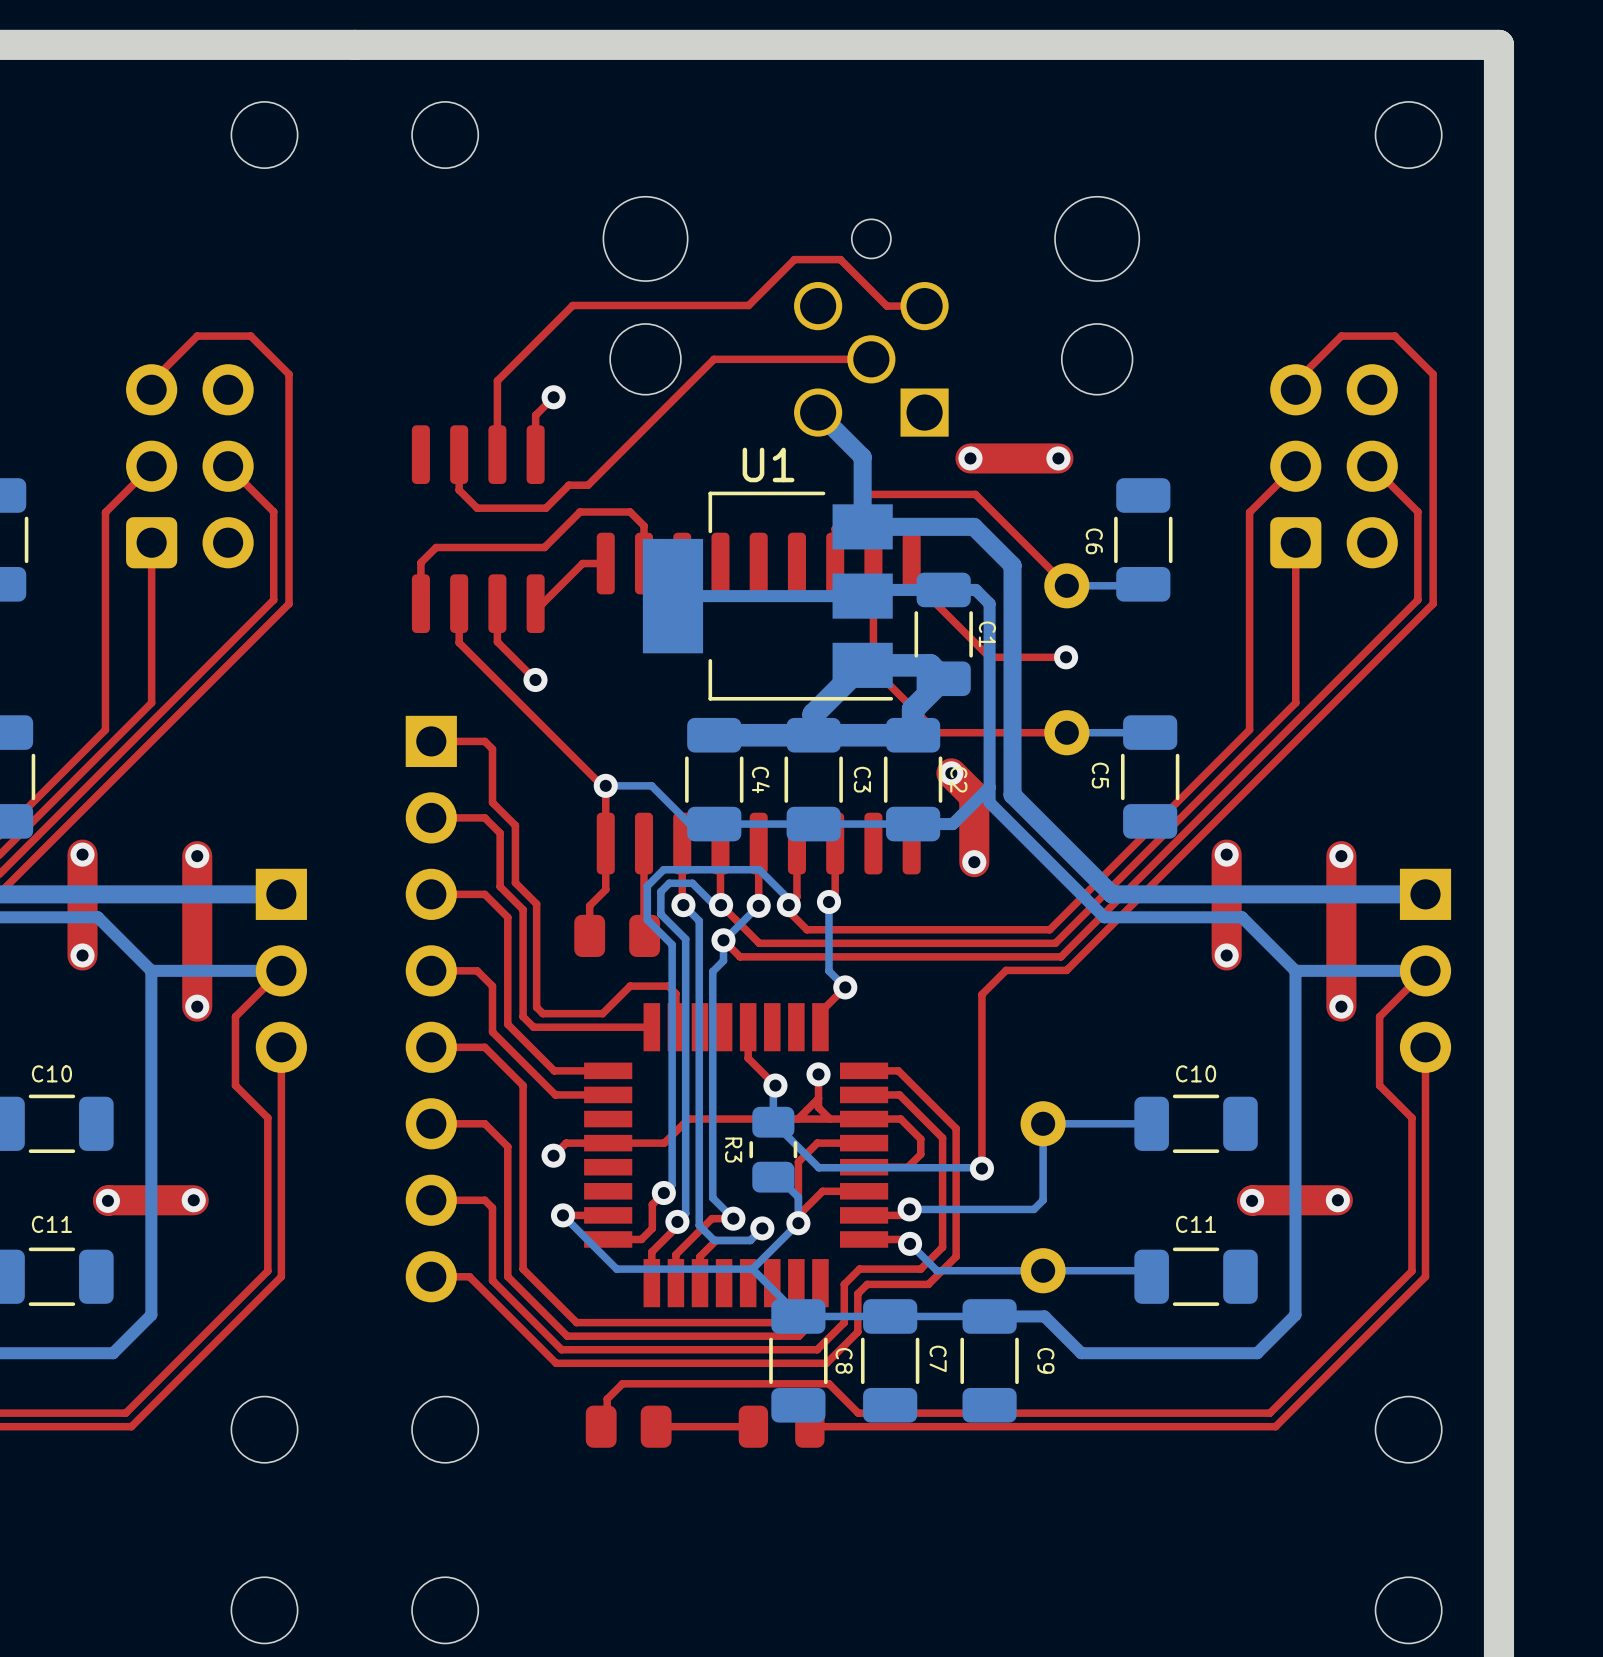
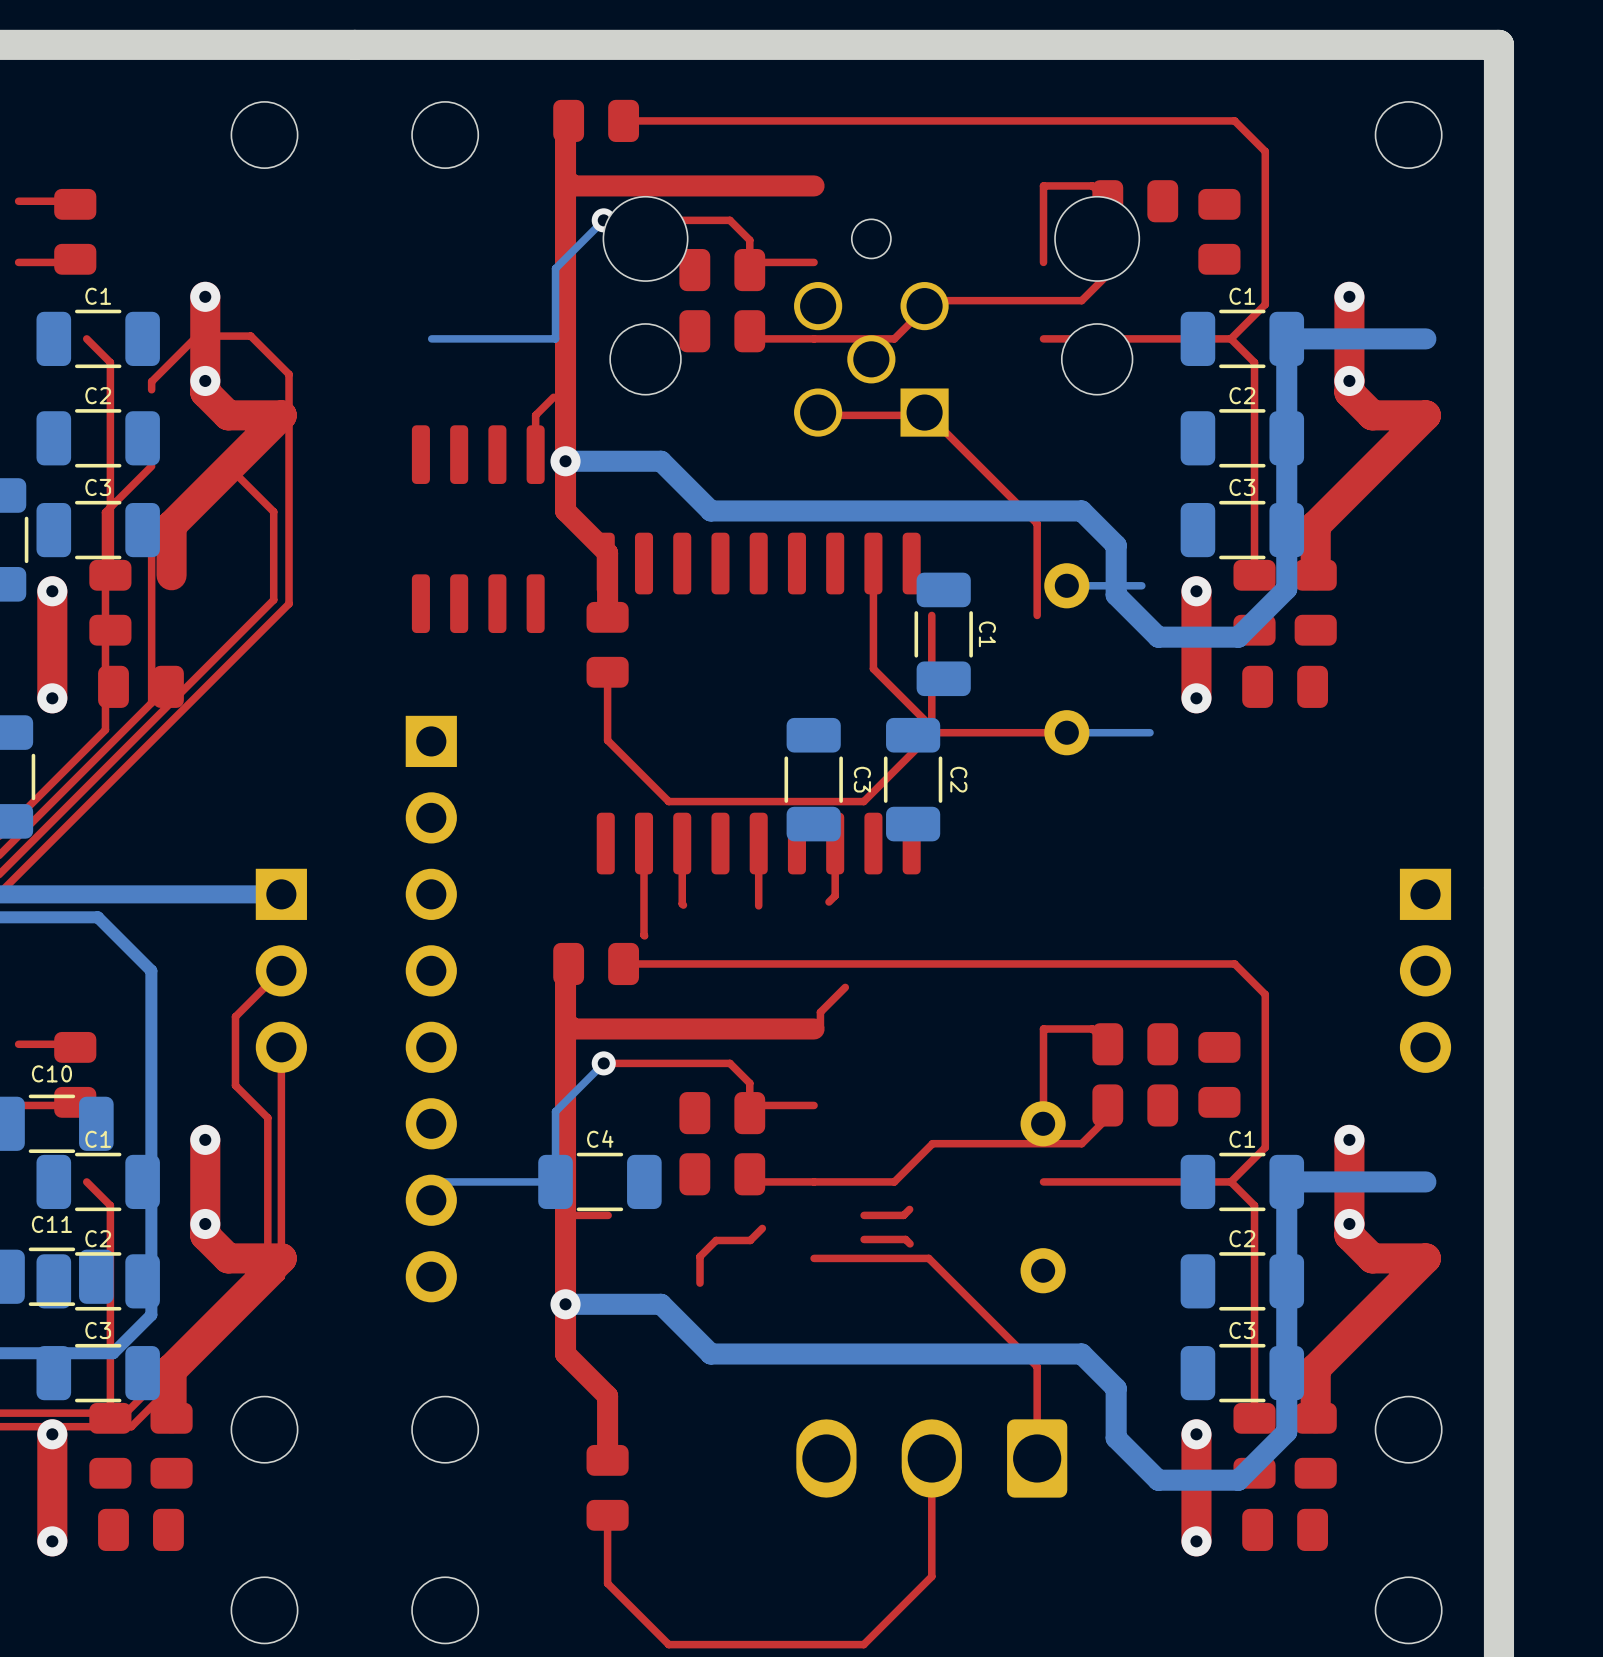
top track: none -> (568, 120) (565, 124) (565, 510) (607, 553) (607, 617)
part: none -> (596, 120)
top track: none -> (623, 120) (1234, 120) (1265, 151) (1265, 304) (1230, 338)
top track: none -> (565, 178) (573, 185) (814, 185)
top track: none -> (18, 201) (72, 201) (75, 204)
top track: none -> (1107, 201) (1092, 185) (1043, 185) (1043, 262)
part: none -> (1135, 201)
top track: none -> (603, 220) (729, 220) (749, 240) (749, 270) (757, 262) (814, 262)
bottom track: none -> (603, 220) (555, 268) (555, 338) (431, 338)
via: none -> (603, 220)
part: none -> (75, 231)
part: none -> (1219, 231)
top track: none -> (75, 259) (72, 262) (18, 262)
top track: none -> (1107, 262) (1107, 274) (1081, 300) (932, 300) (894, 338) (757, 338) (749, 331)
part: none -> (722, 270)
top track: none -> (205, 296) (205, 392) (228, 415) (281, 415) (171, 525) (171, 575)
via: none -> (205, 296)
top track: none -> (1349, 296) (1349, 392) (1372, 415) (1425, 415) (1315, 525) (1315, 575)
via: none -> (1349, 296)
top track: (924, 306) (886, 306) (840, 259) (794, 259) (748, 305) (572, 305) (497, 380) (497, 454) -> none
part: none -> (722, 331)
top track: none -> (86, 338) (110, 362) (110, 575)
C1: none -> (98, 338)
top track: none -> (1230, 338) (1043, 338)
top track: none -> (1230, 338) (1254, 362) (1254, 575)
C1: none -> (1242, 338)
bottom track: none -> (1425, 338) (1286, 338) (1286, 588) (1238, 637) (1158, 637) (1116, 595) (1116, 545) (1081, 510) (710, 510) (661, 461) (565, 461)
top track: (871, 359) (713, 359) (588, 485) (568, 485) (546, 508) (477, 508) (459, 490) (459, 454) -> none
via: none -> (205, 380)
via: none -> (1349, 380)
top track: (1295, 389) (1295, 381) (1341, 336) (1394, 336) (1433, 374) (1433, 603) (1066, 970) (1006, 970) (981, 994) (981, 1168) -> none
via: (553, 397) -> none
bottom track: (818, 412) (862, 457) (862, 526) (973, 526) (1012, 565) (1012, 794) (1111, 894) (1425, 894) -> none
top track: none -> (814, 415) (928, 415) (1037, 523) (1037, 615)
C2: none -> (98, 438)
C2: none -> (1242, 438)
via: (970, 458) -> none
top track: (1058, 458) (970, 458) -> none
via: (1058, 458) -> none
via: none -> (565, 461)
part: (189, 466) -> none
top track: (1295, 466) (1249, 512) (1249, 729) (1049, 929) (807, 929) (788, 911) (788, 905) (796, 896) (796, 843) -> none
part: (1334, 466) -> none
top track: (1372, 466) (1417, 511) (1417, 599) (1060, 956) (740, 956) (723, 940) -> none
C3: none -> (98, 530)
C3: none -> (1242, 530)
C6: (1143, 539) -> none
top track: (1295, 542) (1295, 702) (1055, 943) (759, 943) (720, 904) (720, 843) -> none
top track: (605, 563) (582, 563) (542, 603) (535, 603) -> none
top track: (644, 563) (644, 525) (630, 511) (580, 511) (544, 547) (436, 547) (420, 562) (420, 603) -> none
top track: (835, 563) (835, 528) (869, 494) (975, 494) (1066, 585) -> none
top track: (911, 563) (911, 579) (989, 657) (1066, 657) -> none
top track: none -> (52, 591) (52, 698)
via: none -> (52, 591)
top track: none -> (1196, 591) (1196, 698)
via: none -> (1196, 591)
bottom track: (672, 596) (862, 596) (868, 589) (975, 589) (989, 603) (989, 802) (1104, 917) (1241, 917) (1295, 970) -> none
U1: (767, 596) -> none
part: none -> (110, 602)
part: none -> (1254, 602)
part: none -> (1315, 602)
top track: (459, 603) (459, 642) (602, 785) (605, 785) (605, 889) (589, 905) (589, 935) -> none
top track: (497, 603) (497, 641) (535, 679) -> none
top track: none -> (931, 615) (931, 733) (863, 801) (668, 801) (607, 740) (607, 672)
part: none -> (607, 644)
via: (1066, 657) -> none
via: (535, 679) -> none
part: none -> (140, 686)
part: none -> (1285, 686)
via: none -> (52, 698)
via: none -> (1196, 698)
bottom track: (813, 735) (813, 714) (862, 665) (930, 665) (943, 678) (913, 709) (913, 735) (714, 735) -> none
top track: (431, 741) (484, 741) (492, 749) (492, 802) (515, 825) (515, 882) (536, 904) (536, 1007) (542, 1013) (602, 1013) (630, 986) (668, 986) (675, 993) (675, 1027) -> none
top track: (951, 773) (974, 796) (974, 862) -> none
via: (951, 773) -> none
C5: (1150, 776) -> none
C4 rotation: 0° (714, 779) -> 90° clockwise (599, 1181)
C4 position: (714, 779) -> (599, 1181)
C4 name position: C4 (760, 780) -> C4 (600, 1138)
bottom track: (605, 785) (651, 785) (689, 824) (952, 824) (989, 787) -> none
via: (605, 785) -> none
top track: (431, 817) (484, 817) (500, 833) (500, 886) (523, 909) (523, 1016) (533, 1027) (651, 1027) -> none
top track: (82, 854) (82, 955) -> none
via: (82, 854) -> none
top track: (1226, 854) (1226, 955) -> none
via: (1226, 854) -> none
top track: (197, 856) (197, 1006) -> none
via: (197, 856) -> none
top track: (1341, 856) (1341, 1006) -> none
via: (1341, 856) -> none
via: (974, 862) -> none
top track: (431, 894) (484, 894) (507, 917) (507, 1024) (554, 1070) (608, 1070) -> none
bottom track: (828, 902) (828, 971) (845, 987) -> none
via: (828, 902) -> none
bottom track: (683, 905) (699, 920) (699, 1225) (714, 1240) (750, 1240) (762, 1228) -> none
via: (683, 905) -> none
bottom track: (721, 905) (714, 905) (692, 883) (669, 883) (660, 891) (660, 914) (685, 939) (685, 1213) (677, 1221) -> none
via: (721, 905) -> none
bottom track: (758, 905) (723, 940) (723, 960) (712, 971) (712, 1198) (733, 1218) -> none
via: (758, 905) -> none
bottom track: (788, 905) (788, 899) (759, 869) (663, 869) (647, 886) (647, 919) (672, 944) (672, 1184) (663, 1193) -> none
via: (788, 905) -> none
part position: (617, 935) -> (596, 963)
via: (723, 940) -> none
via: (82, 955) -> none
via: (1226, 955) -> none
top track: none -> (568, 963) (565, 967) (565, 1354) (607, 1396) (607, 1460)
top track: none -> (623, 963) (1234, 963) (1265, 994) (1265, 1147) (1230, 1181)
bottom track: (281, 970) (151, 970) -> none
top track: (431, 970) (477, 970) (492, 986) (492, 1032) (555, 1094) (608, 1094) -> none
bottom track: (1295, 970) (1295, 1314) (1257, 1353) (1081, 1353) (1044, 1316) (798, 1316) (752, 1269) -> none
top track: (1425, 970) (1379, 1016) (1379, 1085) (1411, 1117) (1411, 1271) (1269, 1413) (858, 1413) (828, 1383) (622, 1383) (607, 1399) (607, 1420) (601, 1426) -> none
bottom track: (1425, 970) (1295, 970) -> none
via: (845, 987) -> none
via: (197, 1006) -> none
via: (1341, 1006) -> none
top track: none -> (565, 1021) (573, 1028) (814, 1028)
top track: (748, 1027) (748, 1058) (775, 1085) -> none
top track: none -> (18, 1044) (72, 1044) (75, 1047)
top track: none -> (1107, 1044) (1092, 1028) (1043, 1028) (1043, 1105)
part: none -> (1135, 1044)
top track: (431, 1047) (484, 1047) (523, 1085) (523, 1269) (576, 1322) (788, 1322) (796, 1314) (796, 1283) -> none
top track: (1425, 1047) (1425, 1276) (1275, 1426) (809, 1426) -> none
top track: none -> (603, 1063) (729, 1063) (749, 1083) (749, 1113) (757, 1105) (814, 1105)
bottom track: none -> (603, 1063) (555, 1111) (555, 1181) (431, 1181)
via: none -> (603, 1063)
top track: (864, 1070) (898, 1070) (956, 1128) (956, 1256) (928, 1284) (867, 1284) (857, 1293) (857, 1332) (826, 1363) (556, 1363) (469, 1276) (431, 1276) -> none
part: none -> (75, 1074)
top track: (818, 1074) (818, 1107) (830, 1119) -> none
via: (818, 1074) -> none
part: none -> (1219, 1074)
bottom track: (775, 1085) (773, 1087) (773, 1122) (818, 1167) (981, 1168) -> none
via: (775, 1085) -> none
top track: (864, 1094) (899, 1094) (942, 1137) (942, 1247) (920, 1269) (859, 1269) (844, 1284) (844, 1322) (817, 1349) (561, 1349) (492, 1280) (492, 1207) (484, 1200) (431, 1200) -> none
top track: (818, 1098) (797, 1119) -> none
top track: none -> (75, 1102) (72, 1105) (18, 1105)
top track: none -> (1107, 1105) (1107, 1117) (1081, 1143) (932, 1143) (894, 1181) (757, 1181) (749, 1174)
part: none -> (1135, 1105)
part: none -> (722, 1113)
top track: (431, 1123) (484, 1123) (507, 1146) (507, 1276) (567, 1336) (799, 1336) (820, 1314) (820, 1283) -> none
bottom track: (1151, 1123) (1043, 1123) (1043, 1200) (1033, 1209) (909, 1209) -> none
C10: (1196, 1123) -> none
top track: none -> (205, 1139) (205, 1235) (228, 1258) (281, 1258) (171, 1368) (171, 1418)
via: none -> (205, 1139)
top track: none -> (1349, 1139) (1349, 1235) (1372, 1258) (1425, 1258) (1315, 1368) (1315, 1418)
via: none -> (1349, 1139)
top track: (864, 1143) (817, 1143) (798, 1162) (798, 1223) -> none
R3: (773, 1149) -> none
top track: (553, 1155) (566, 1143) (664, 1143) (688, 1119) (900, 1119) (920, 1139) (920, 1154) (907, 1167) (864, 1167) -> none
via: (553, 1155) -> none
part: (736, 1155) -> none
via: (981, 1168) -> none
part: none -> (722, 1174)
bottom track: (773, 1177) (778, 1177) (798, 1197) (798, 1223) (752, 1269) -> none
top track: none -> (86, 1181) (110, 1205) (110, 1418)
C1: none -> (98, 1181)
top track: none -> (1230, 1181) (1043, 1181)
top track: none -> (1230, 1181) (1254, 1205) (1254, 1418)
C1: none -> (1242, 1181)
bottom track: none -> (1425, 1181) (1286, 1181) (1286, 1431) (1238, 1480) (1158, 1480) (1116, 1438) (1116, 1388) (1081, 1354) (710, 1354) (661, 1304) (565, 1304)
top track: (864, 1191) (822, 1191) (798, 1215) -> none
top track: (663, 1193) (652, 1204) (652, 1228) (641, 1239) (608, 1239) -> none
via: (663, 1193) -> none
via: (107, 1200) -> none
top track: (193, 1200) (107, 1200) -> none
via position: (193, 1200) -> (205, 1224)
via: (1252, 1200) -> none
top track: (1337, 1200) (1252, 1200) -> none
via position: (1337, 1200) -> (1349, 1224)
via: (909, 1209) -> none
bottom track: (563, 1215) (616, 1269) (752, 1269) -> none
via: (563, 1215) -> none
top track: (733, 1218) (711, 1218) (675, 1254) (675, 1283) -> none
via: (733, 1218) -> none
top track: (677, 1221) (677, 1226) (651, 1252) (651, 1283) -> none
via: (677, 1221) -> none
via: (798, 1223) -> none
via: (762, 1228) -> none
bottom track: (910, 1243) (936, 1270) (1145, 1270) (1151, 1276) -> none
via: (910, 1243) -> none
top track: none -> (814, 1258) (928, 1258) (1037, 1366) (1037, 1458)
C11: (1196, 1276) -> none
C2: none -> (98, 1281)
C2: none -> (1242, 1281)
via: none -> (565, 1304)
C8: (798, 1360) -> none
C7: (890, 1360) -> none
C9: (989, 1360) -> none
C3: none -> (98, 1373)
C3: none -> (1242, 1373)
part rotation: 0° (628, 1426) -> 90° clockwise (607, 1487)
part position: (628, 1426) -> (607, 1487)
top track: (753, 1426) (656, 1426) -> none
part: (781, 1426) -> none
top track: none -> (52, 1434) (52, 1541)
via: none -> (52, 1434)
top track: none -> (1196, 1434) (1196, 1541)
via: none -> (1196, 1434)
part: none -> (110, 1445)
part: none -> (171, 1445)
part: none -> (1254, 1445)
part: none -> (1315, 1445)
top track: none -> (931, 1458) (931, 1576) (863, 1644) (668, 1644) (607, 1583) (607, 1515)
part: none -> (931, 1458)
part: none -> (140, 1529)
part: none -> (1285, 1529)
via: none -> (52, 1541)
via: none -> (1196, 1541)

